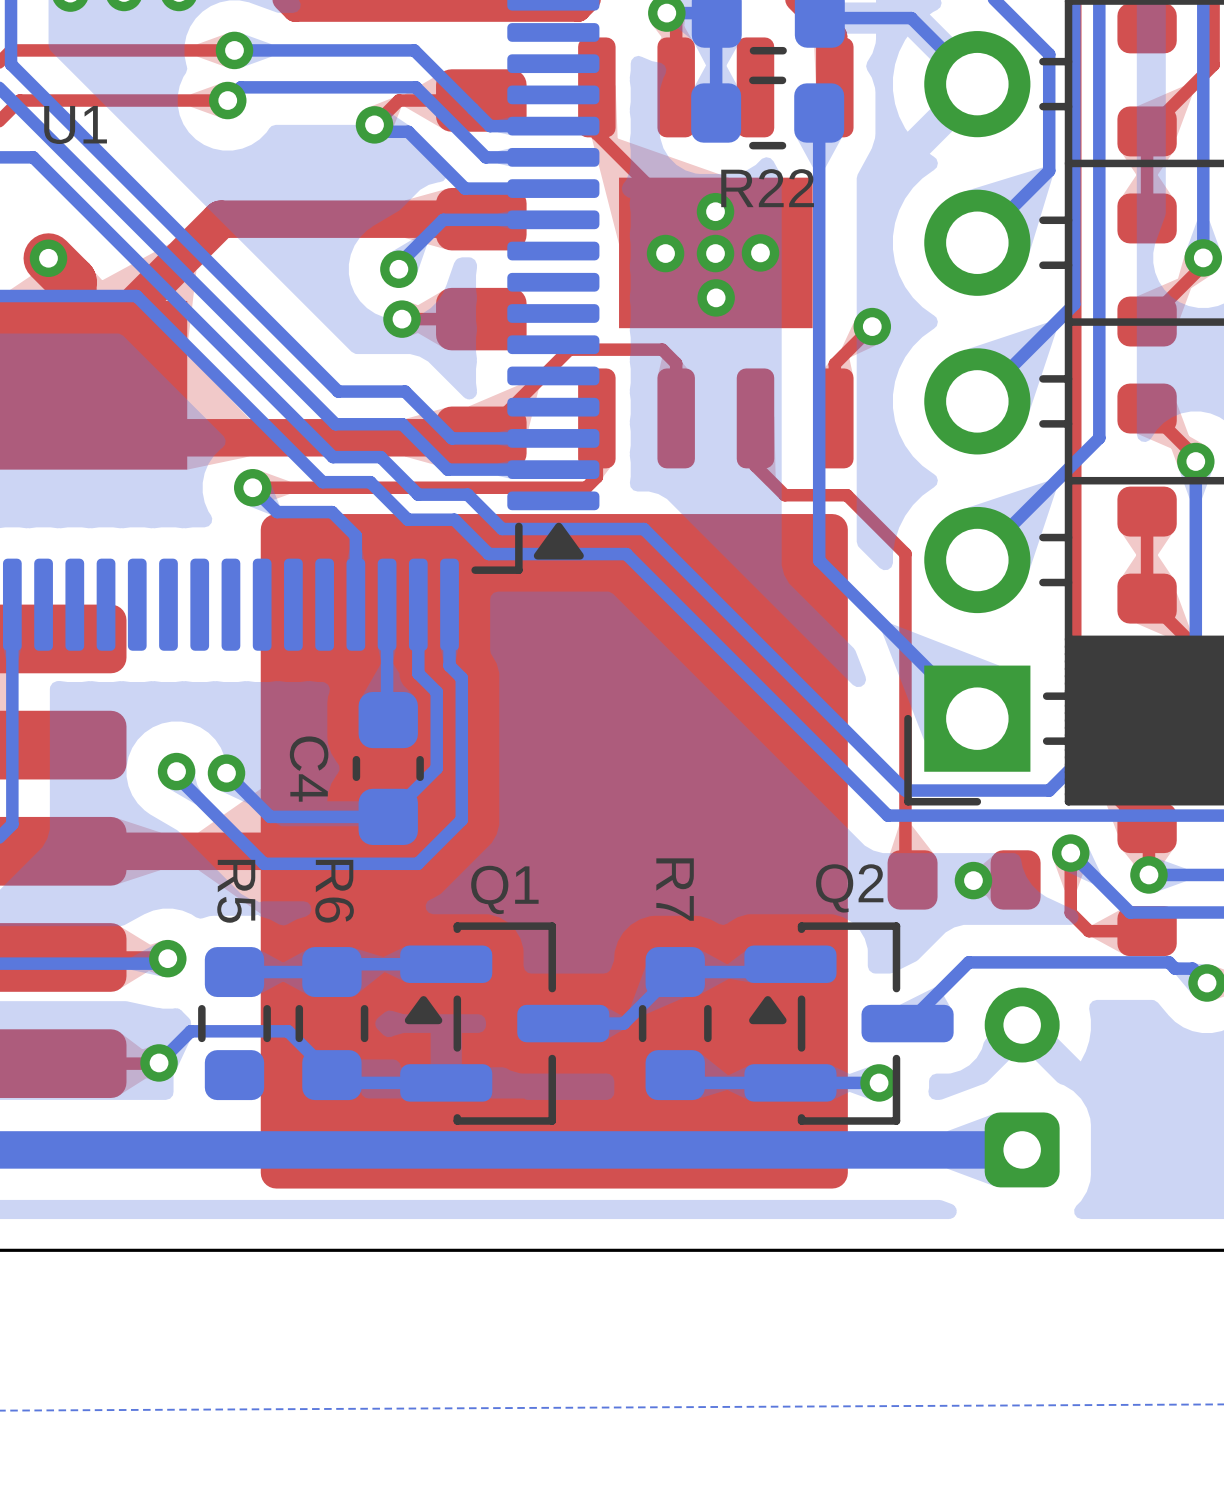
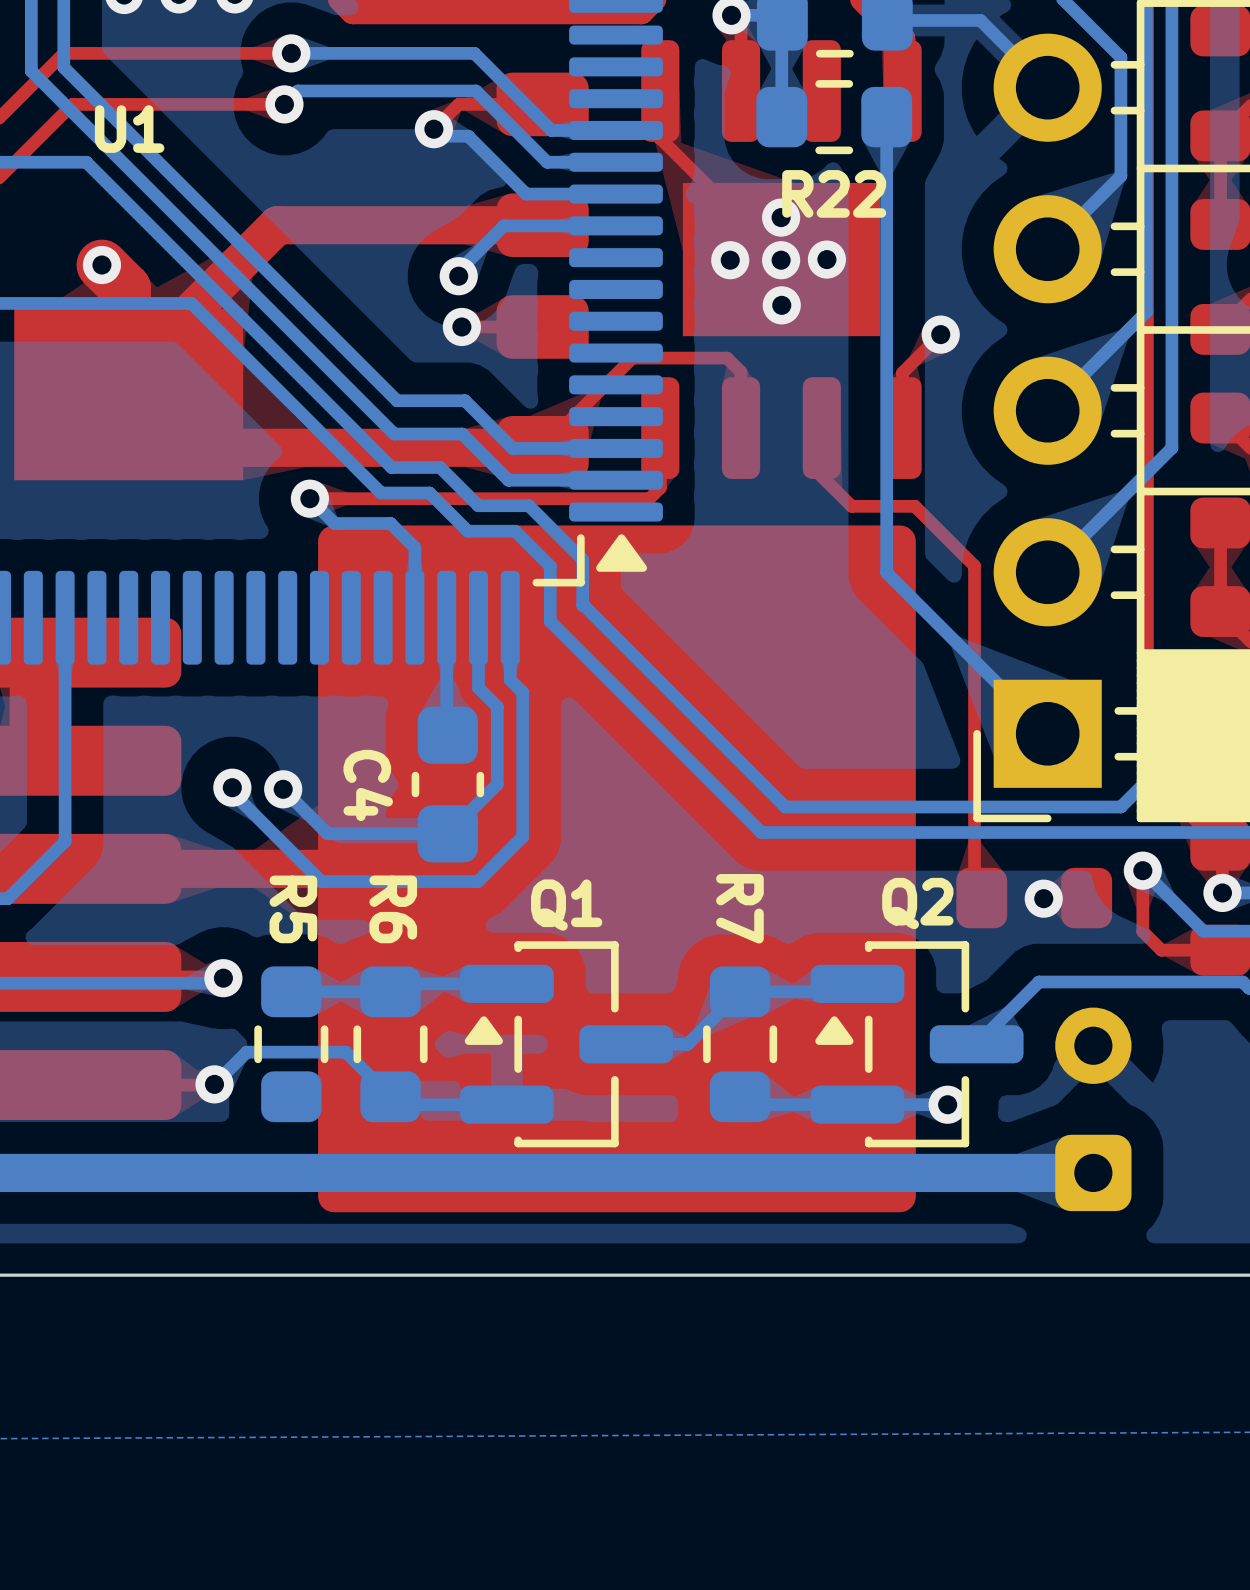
bottom track: (502, 529) (643, 529) (905, 790) -> (583, 605) (785, 807) (974, 807)
bottom track: none -> (563, 540) (582, 559) (582, 605)
bottom track: (488, 554) (626, 554) (887, 815) -> (550, 566) (550, 621) (761, 832) (956, 832)

